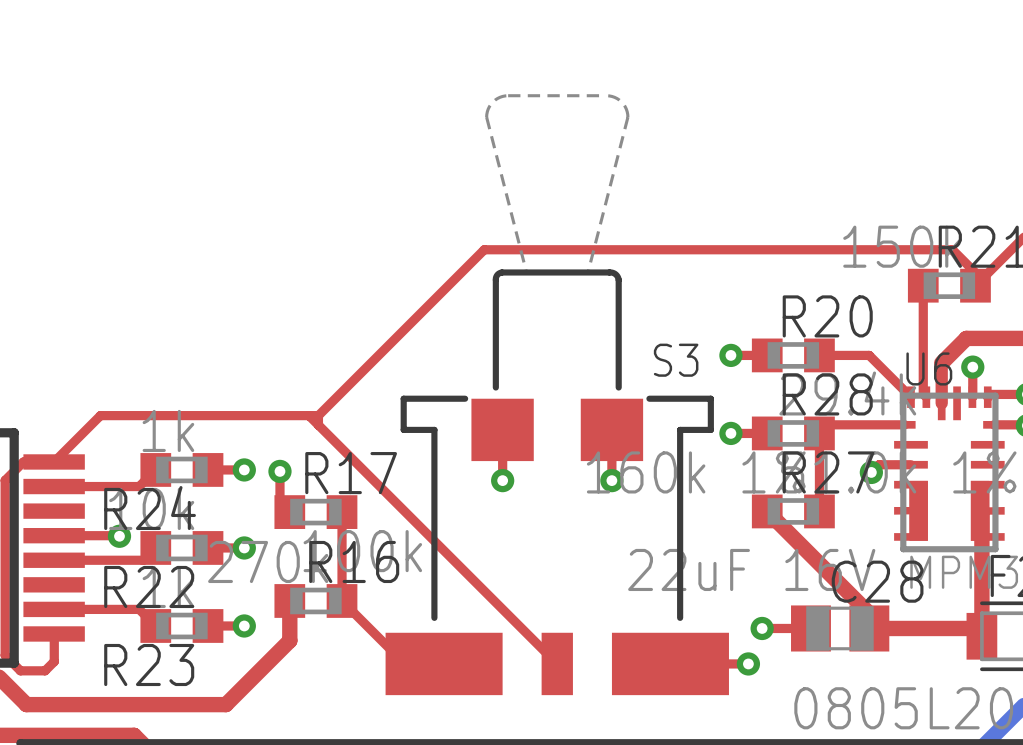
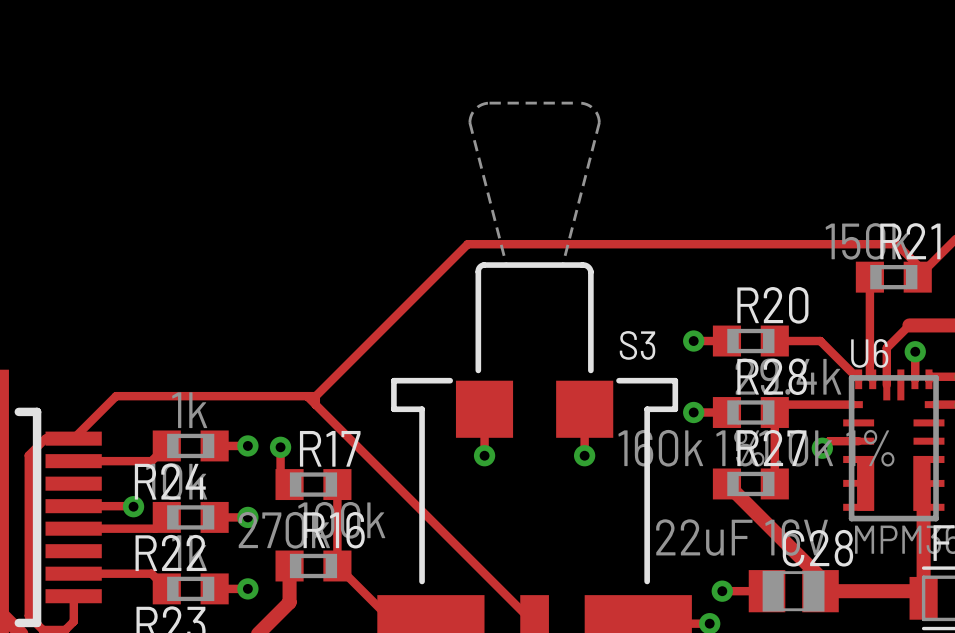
top track width: thick (966, 338) (941, 363) (941, 403) -> thin (909, 325) (886, 348) (886, 384)

